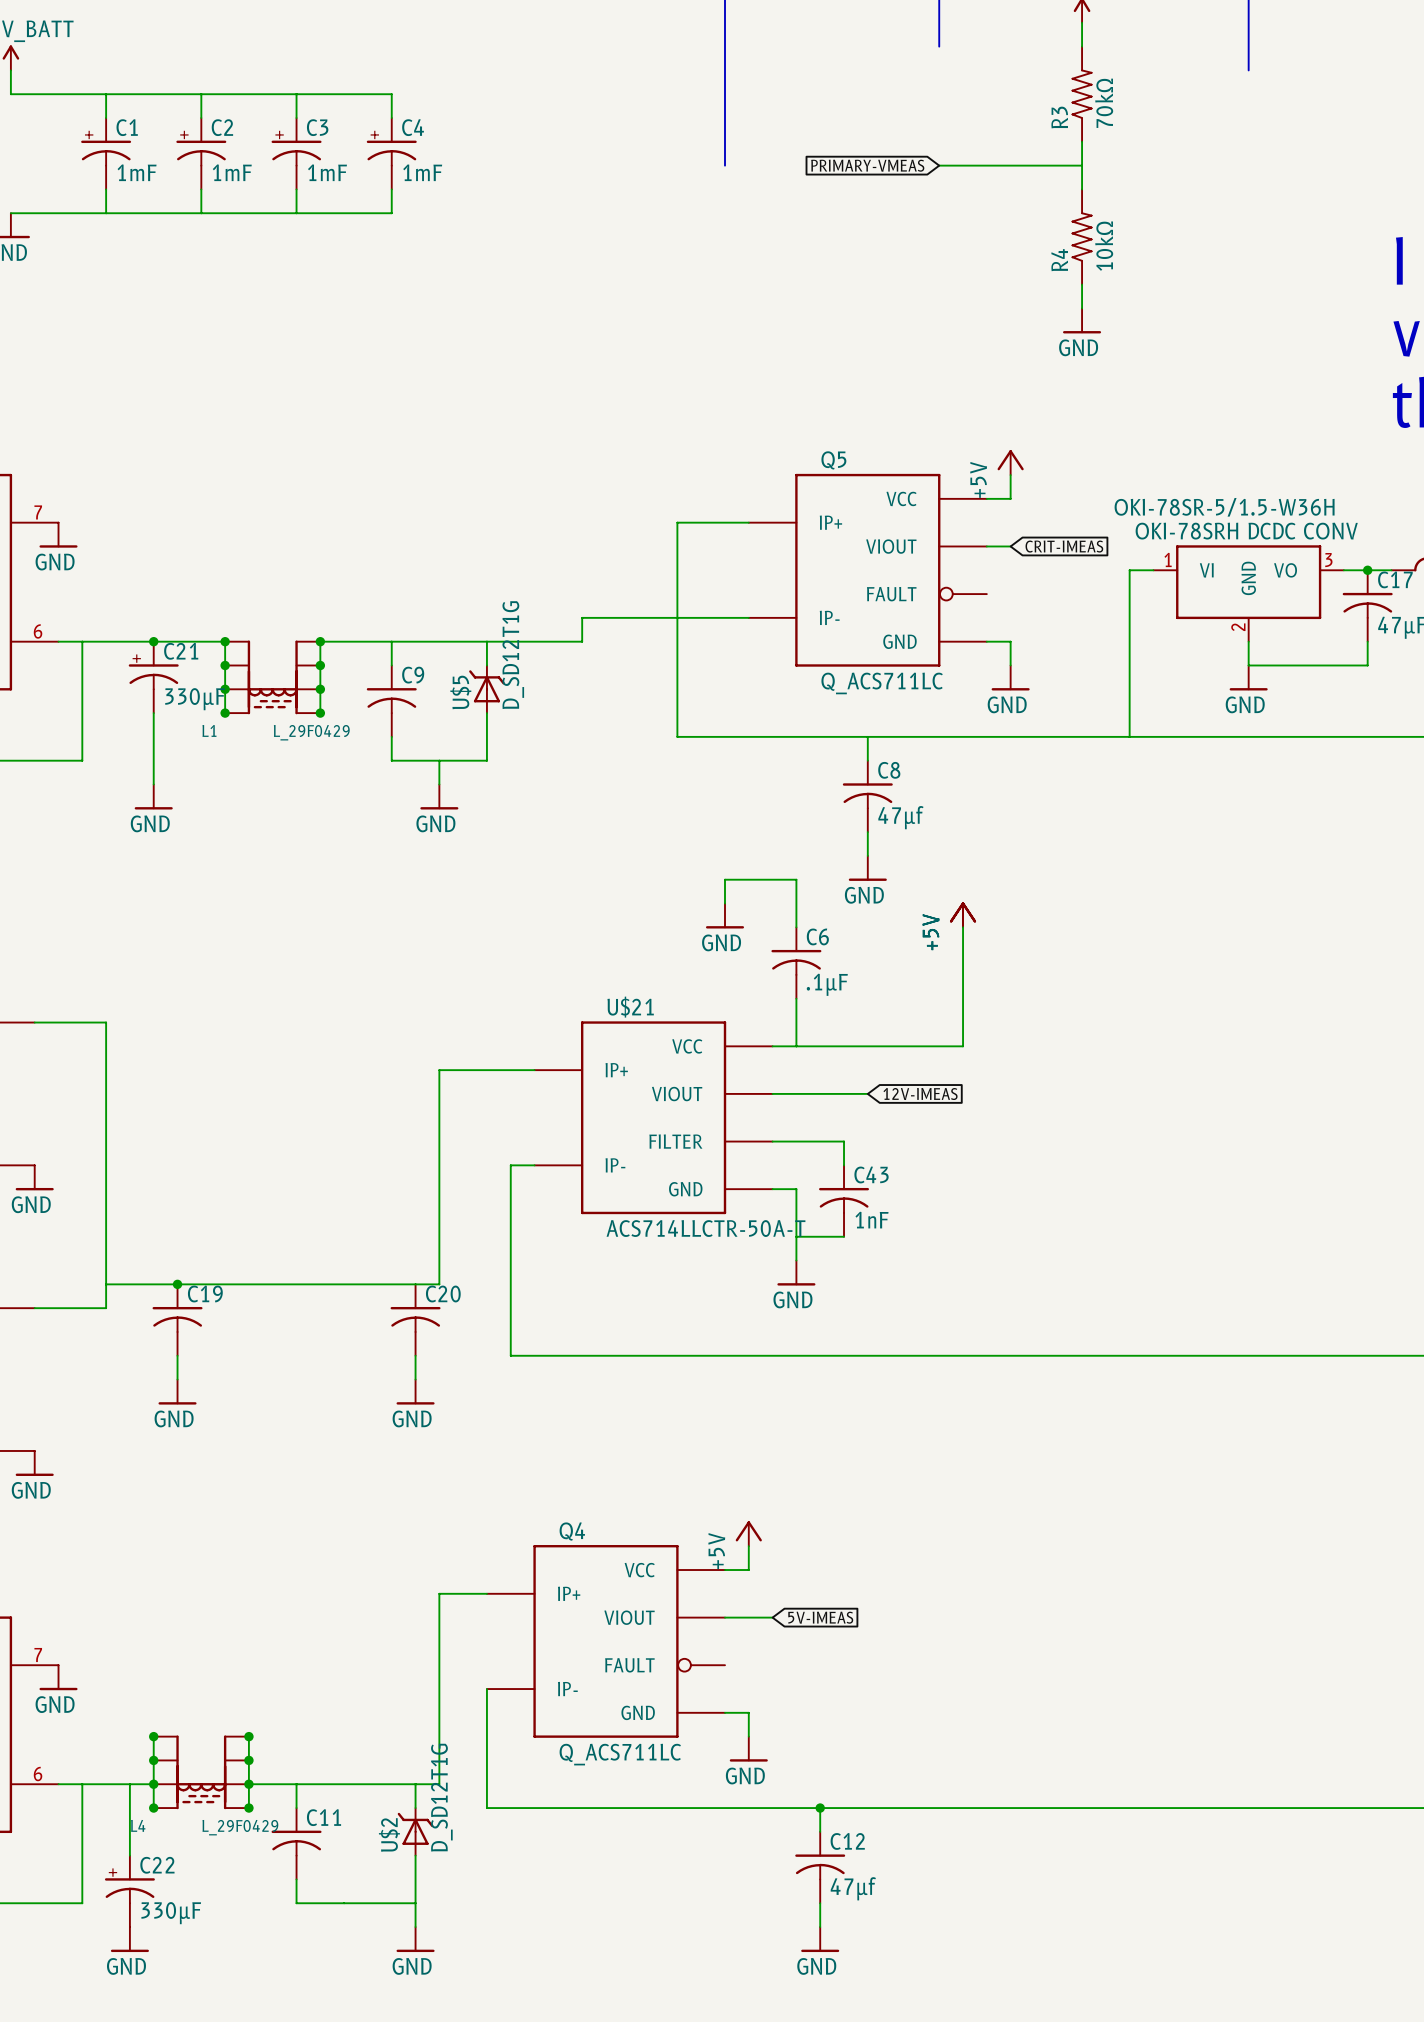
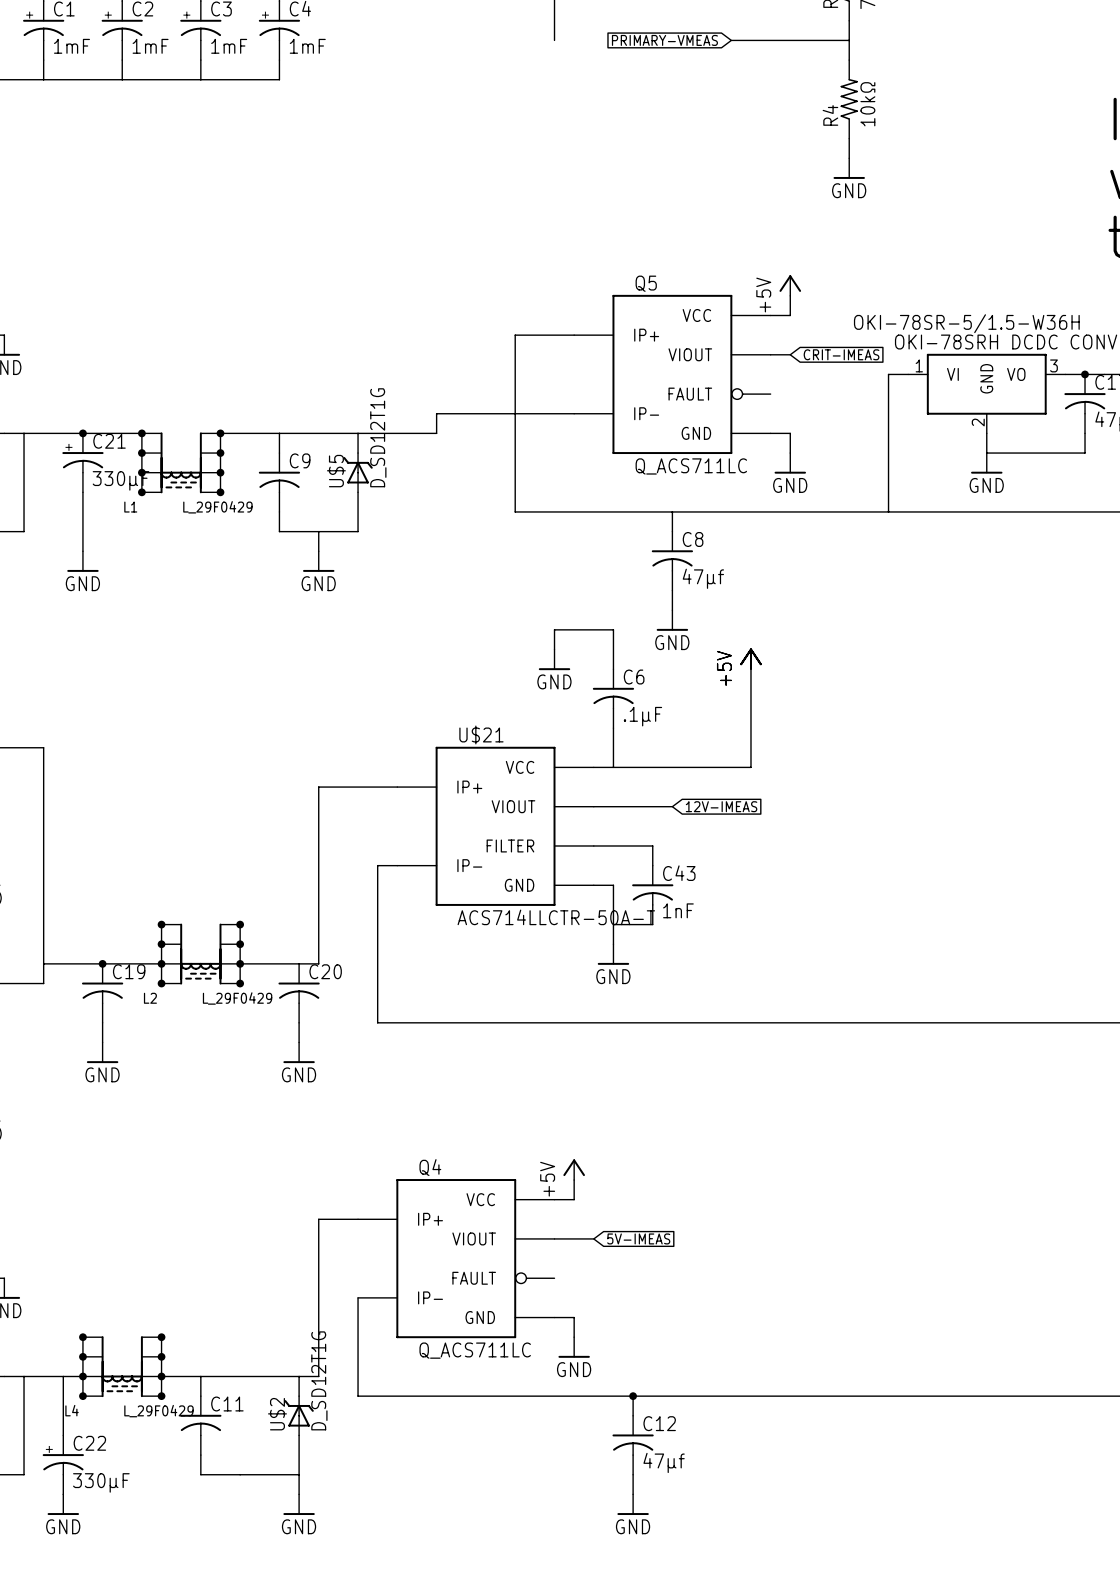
wire: none -> (161, 924) (161, 983)
junction: none -> (161, 924)
wire: none -> (240, 924) (240, 983)
junction: none -> (240, 924)
junction: none -> (161, 944)
junction: none -> (240, 944)
L2: none -> L_29F0429 (200, 954)
junction: none -> (161, 963)
junction: none -> (240, 963)
junction: none -> (161, 983)
junction: none -> (240, 983)

